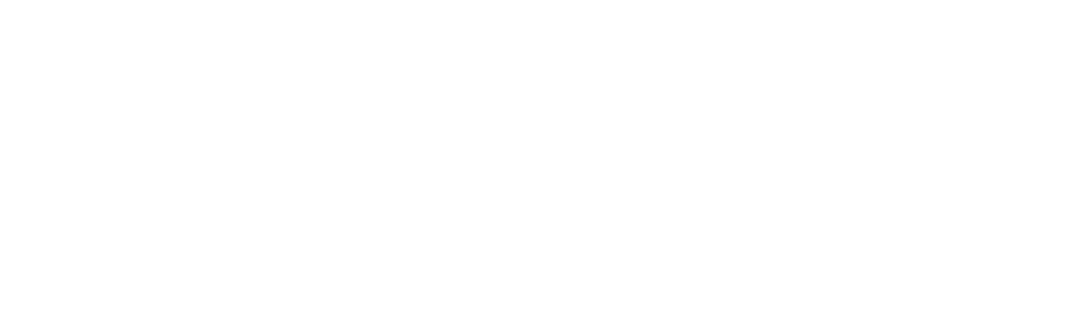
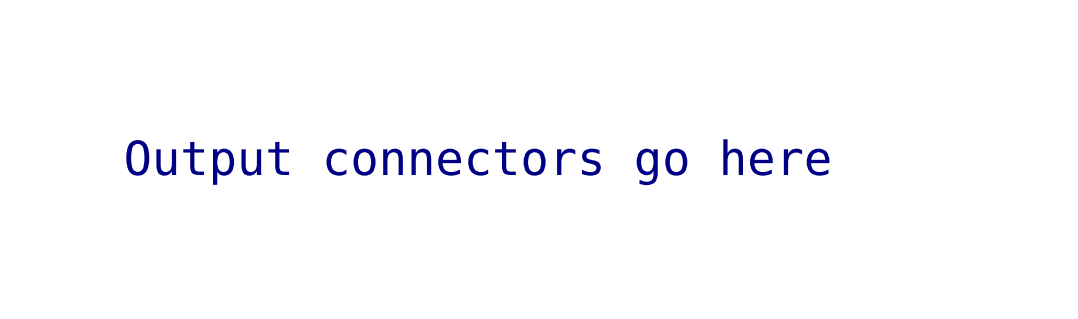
text: none -> Output connectors go here (477, 162)

